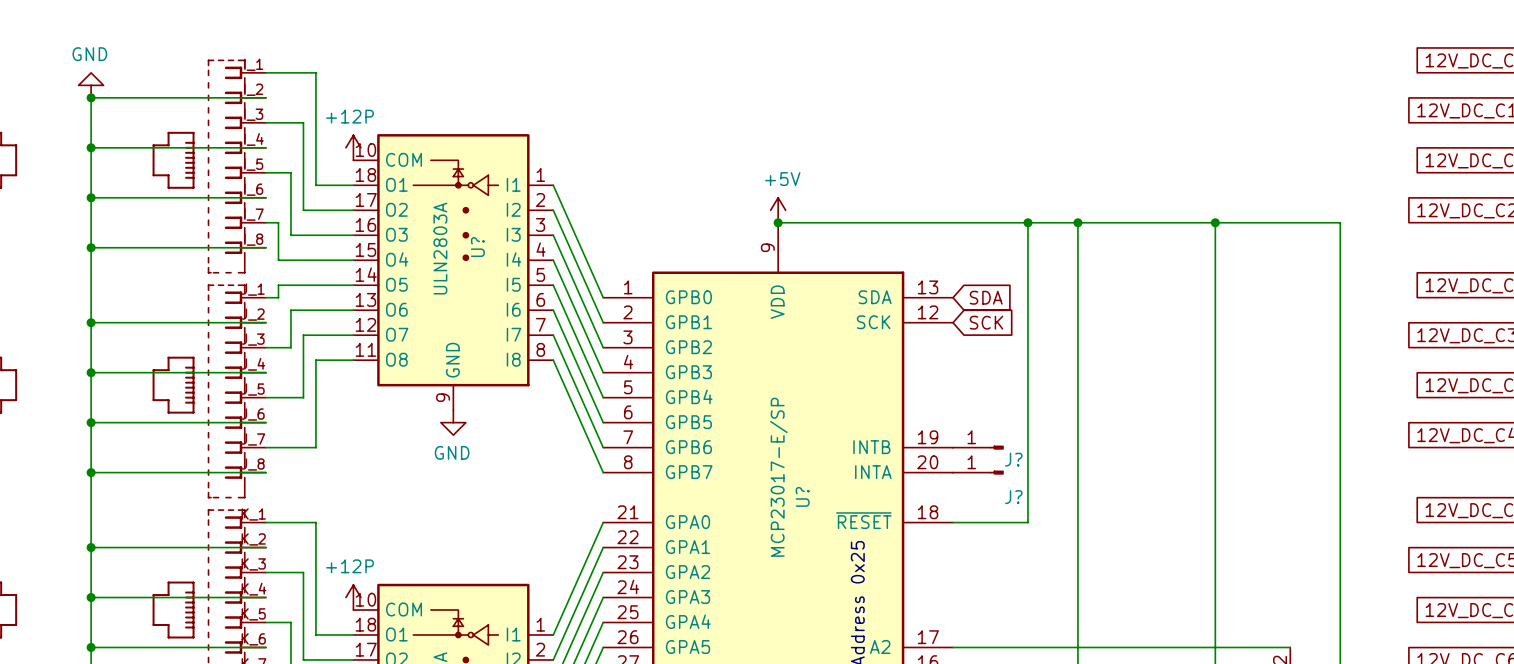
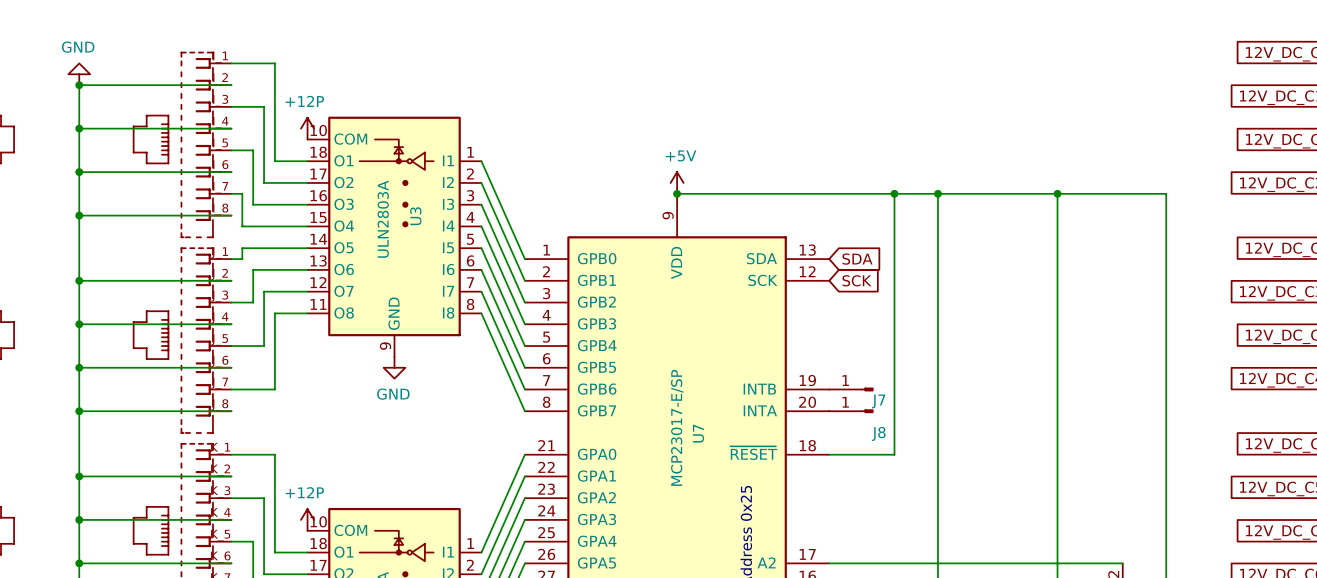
U? name: U? (477, 247) -> U3 (415, 216)
J? name: J? (1013, 459) -> J7 (878, 401)
U? name: U? (802, 496) -> U7 (698, 433)
J? name: J? (1013, 497) -> J8 (878, 433)

